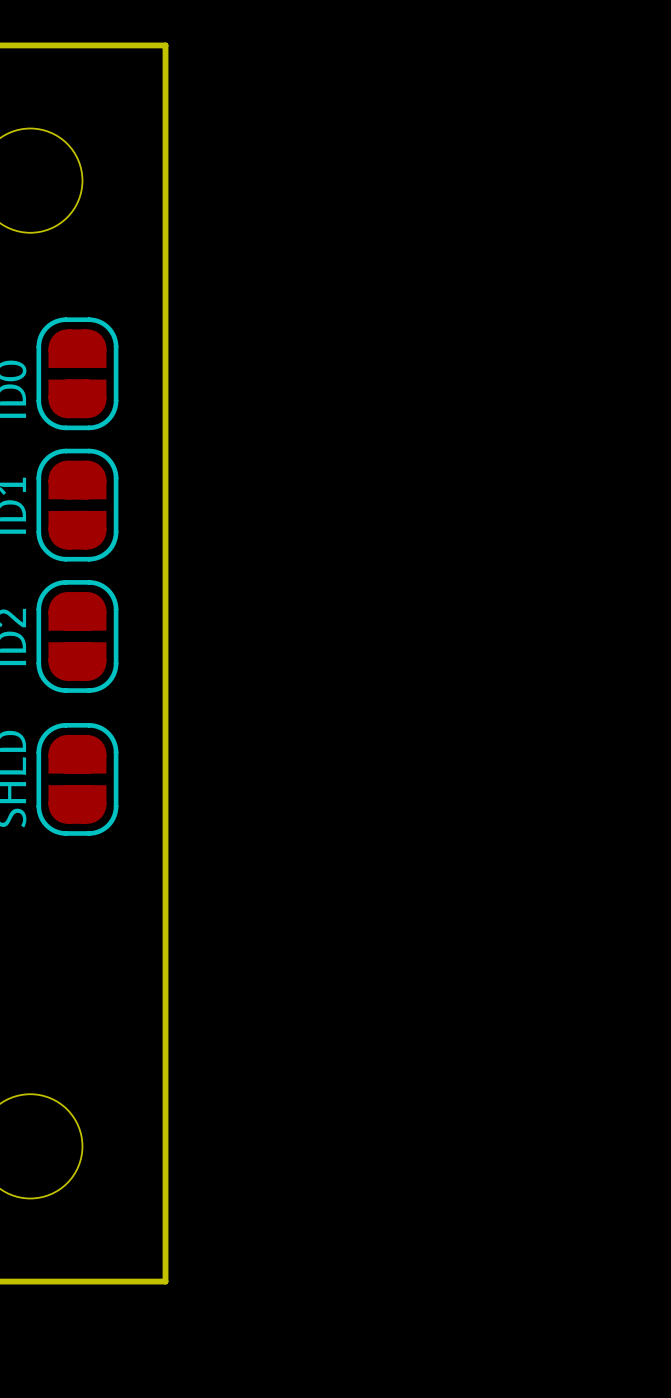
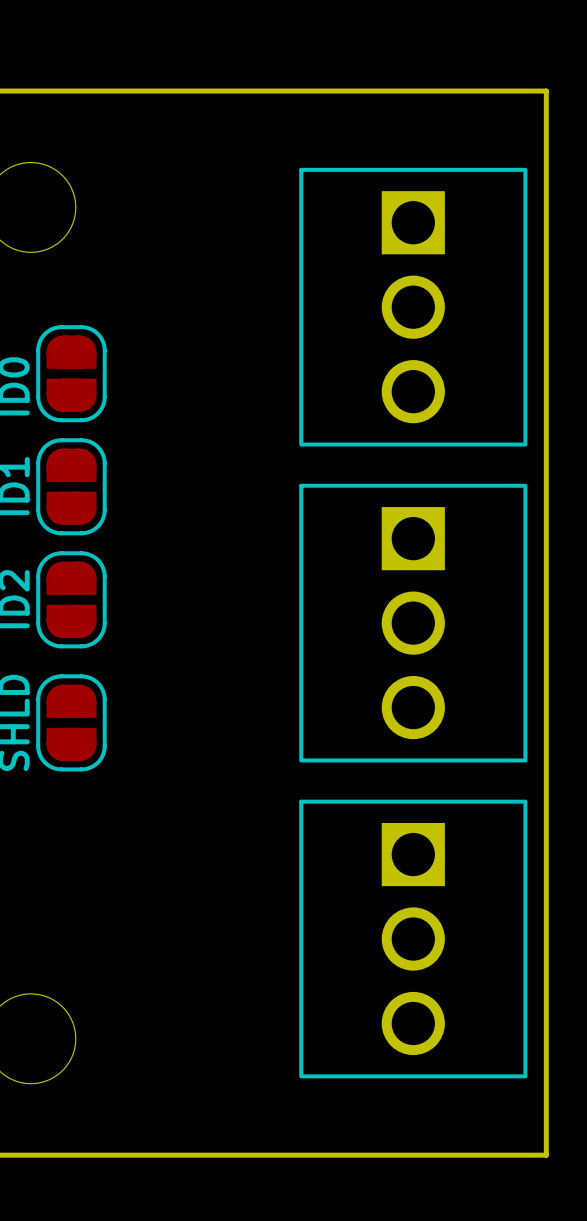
board edge: (165, 45) (165, 1281) -> (147, 91) (546, 91) (546, 1155) (147, 1155)
part: none -> (413, 307)
part: none -> (413, 623)
part: none -> (413, 939)

